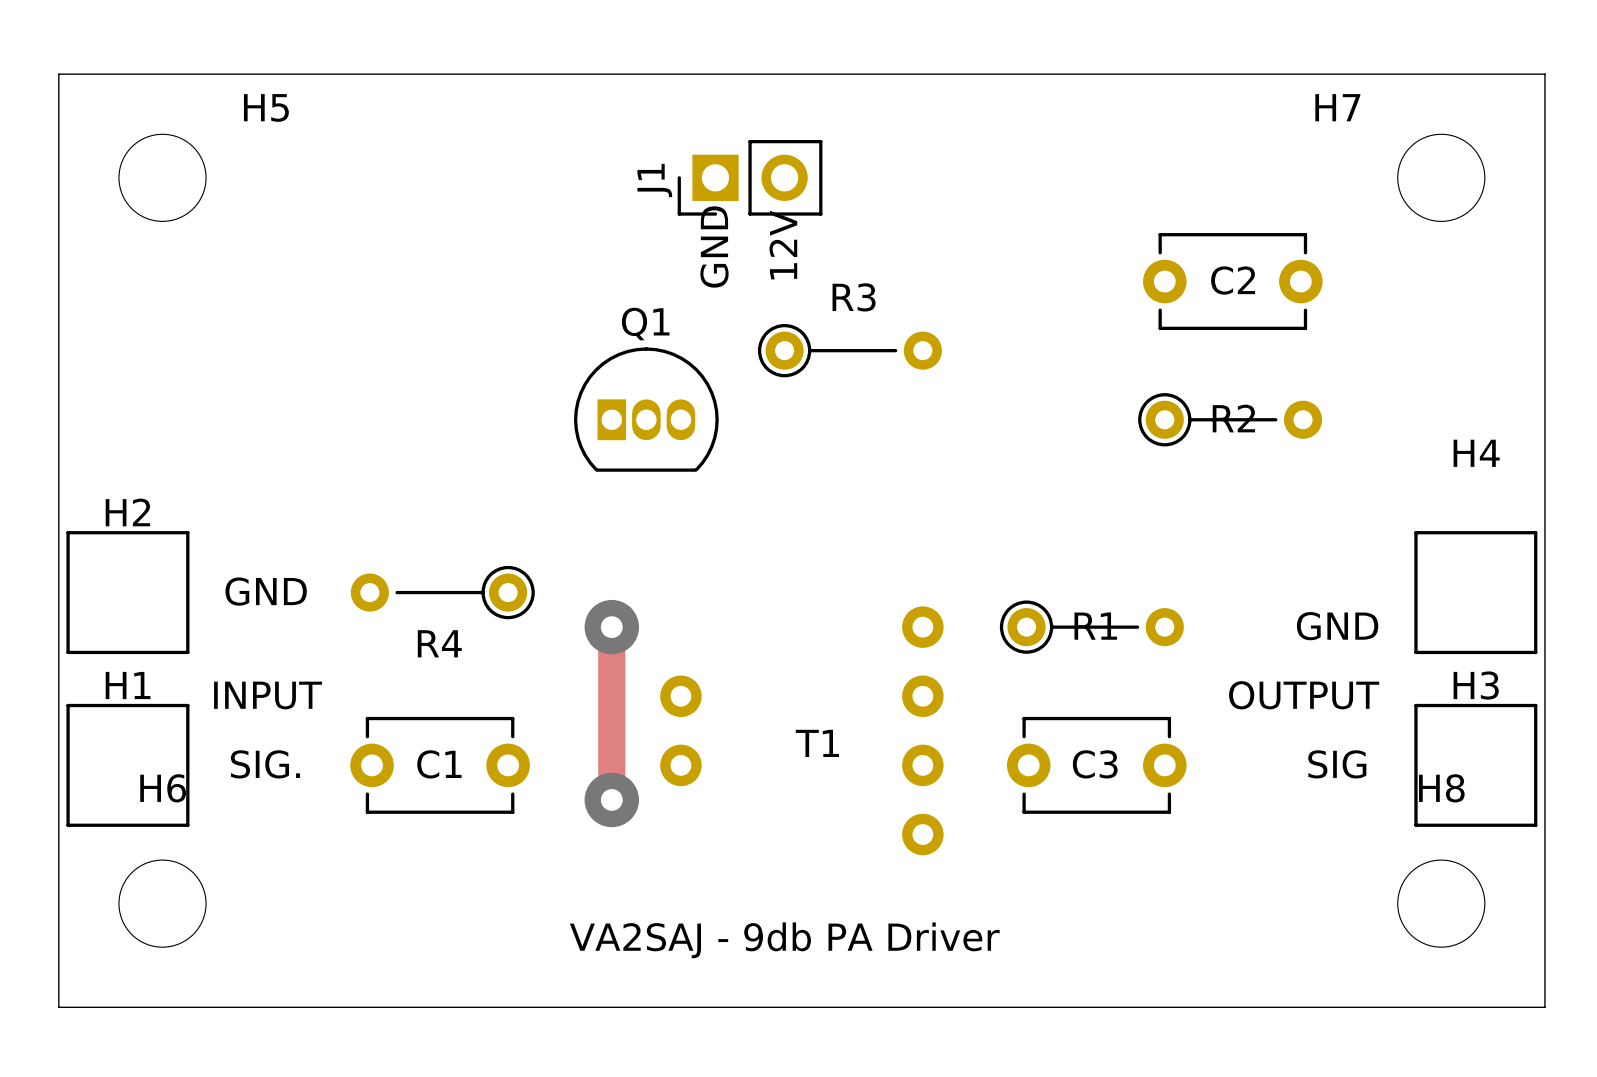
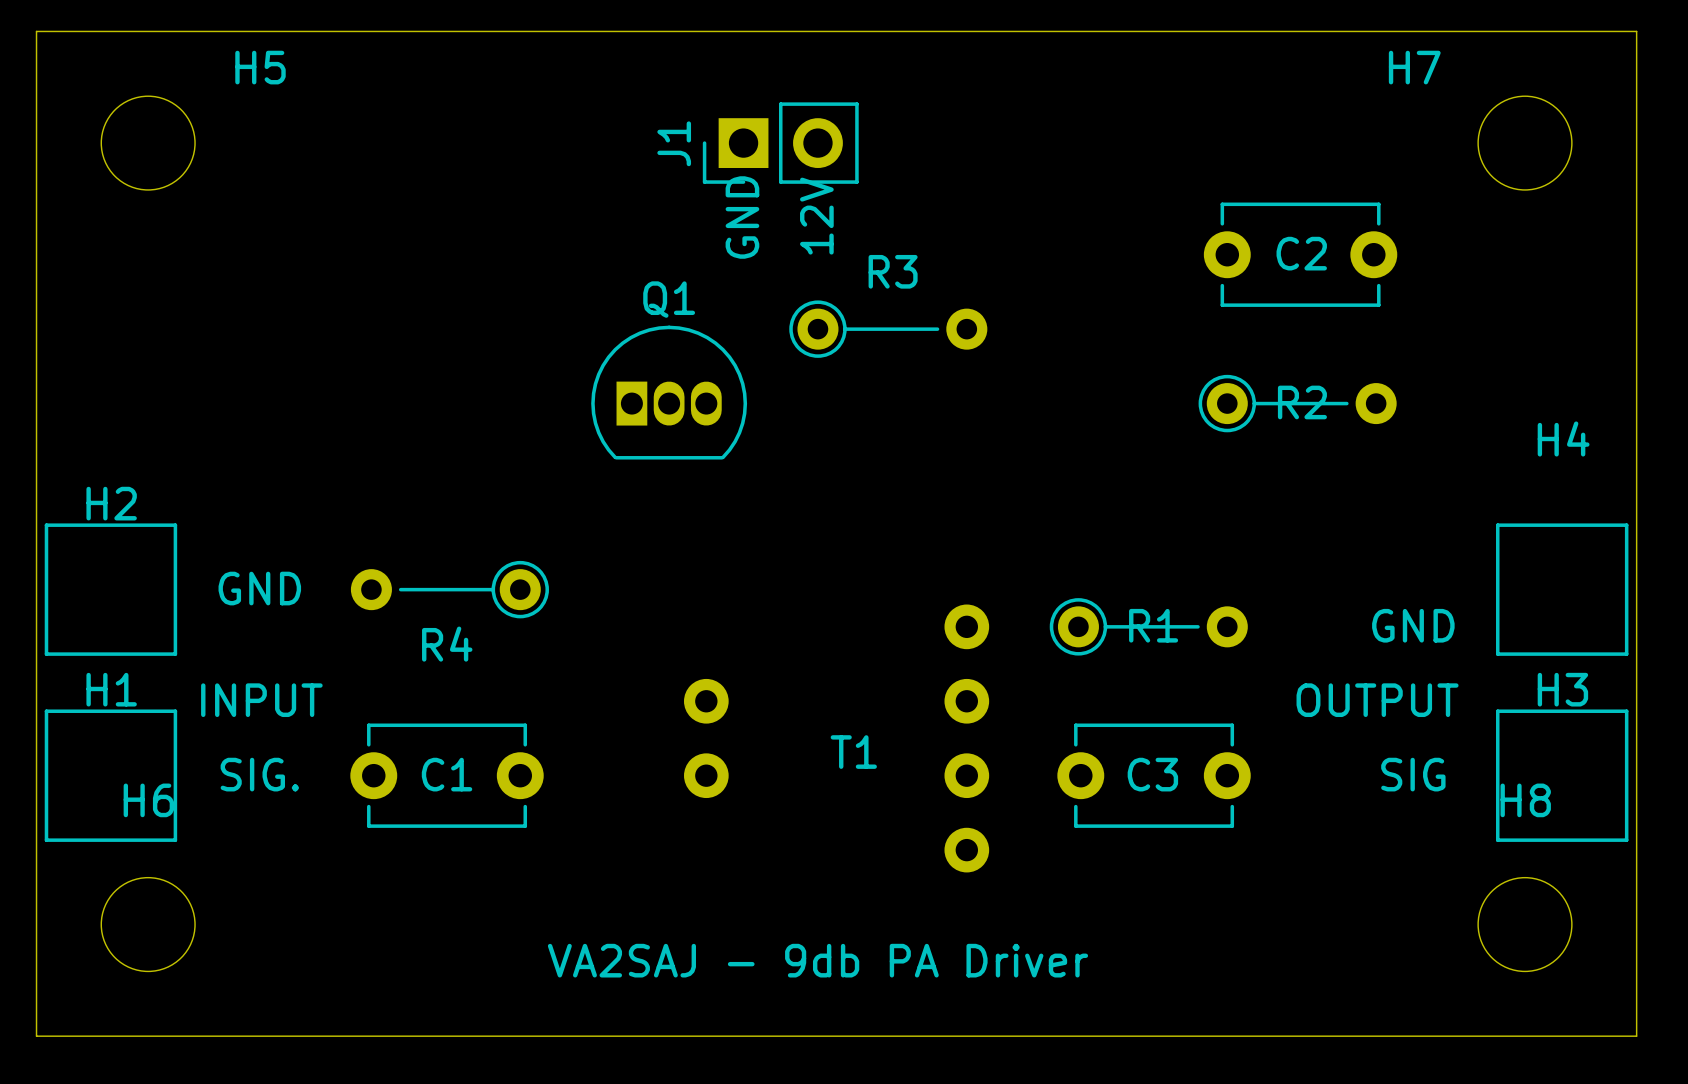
track: (611, 627) (611, 799) -> none
via: (611, 627) -> none
via: (611, 799) -> none

